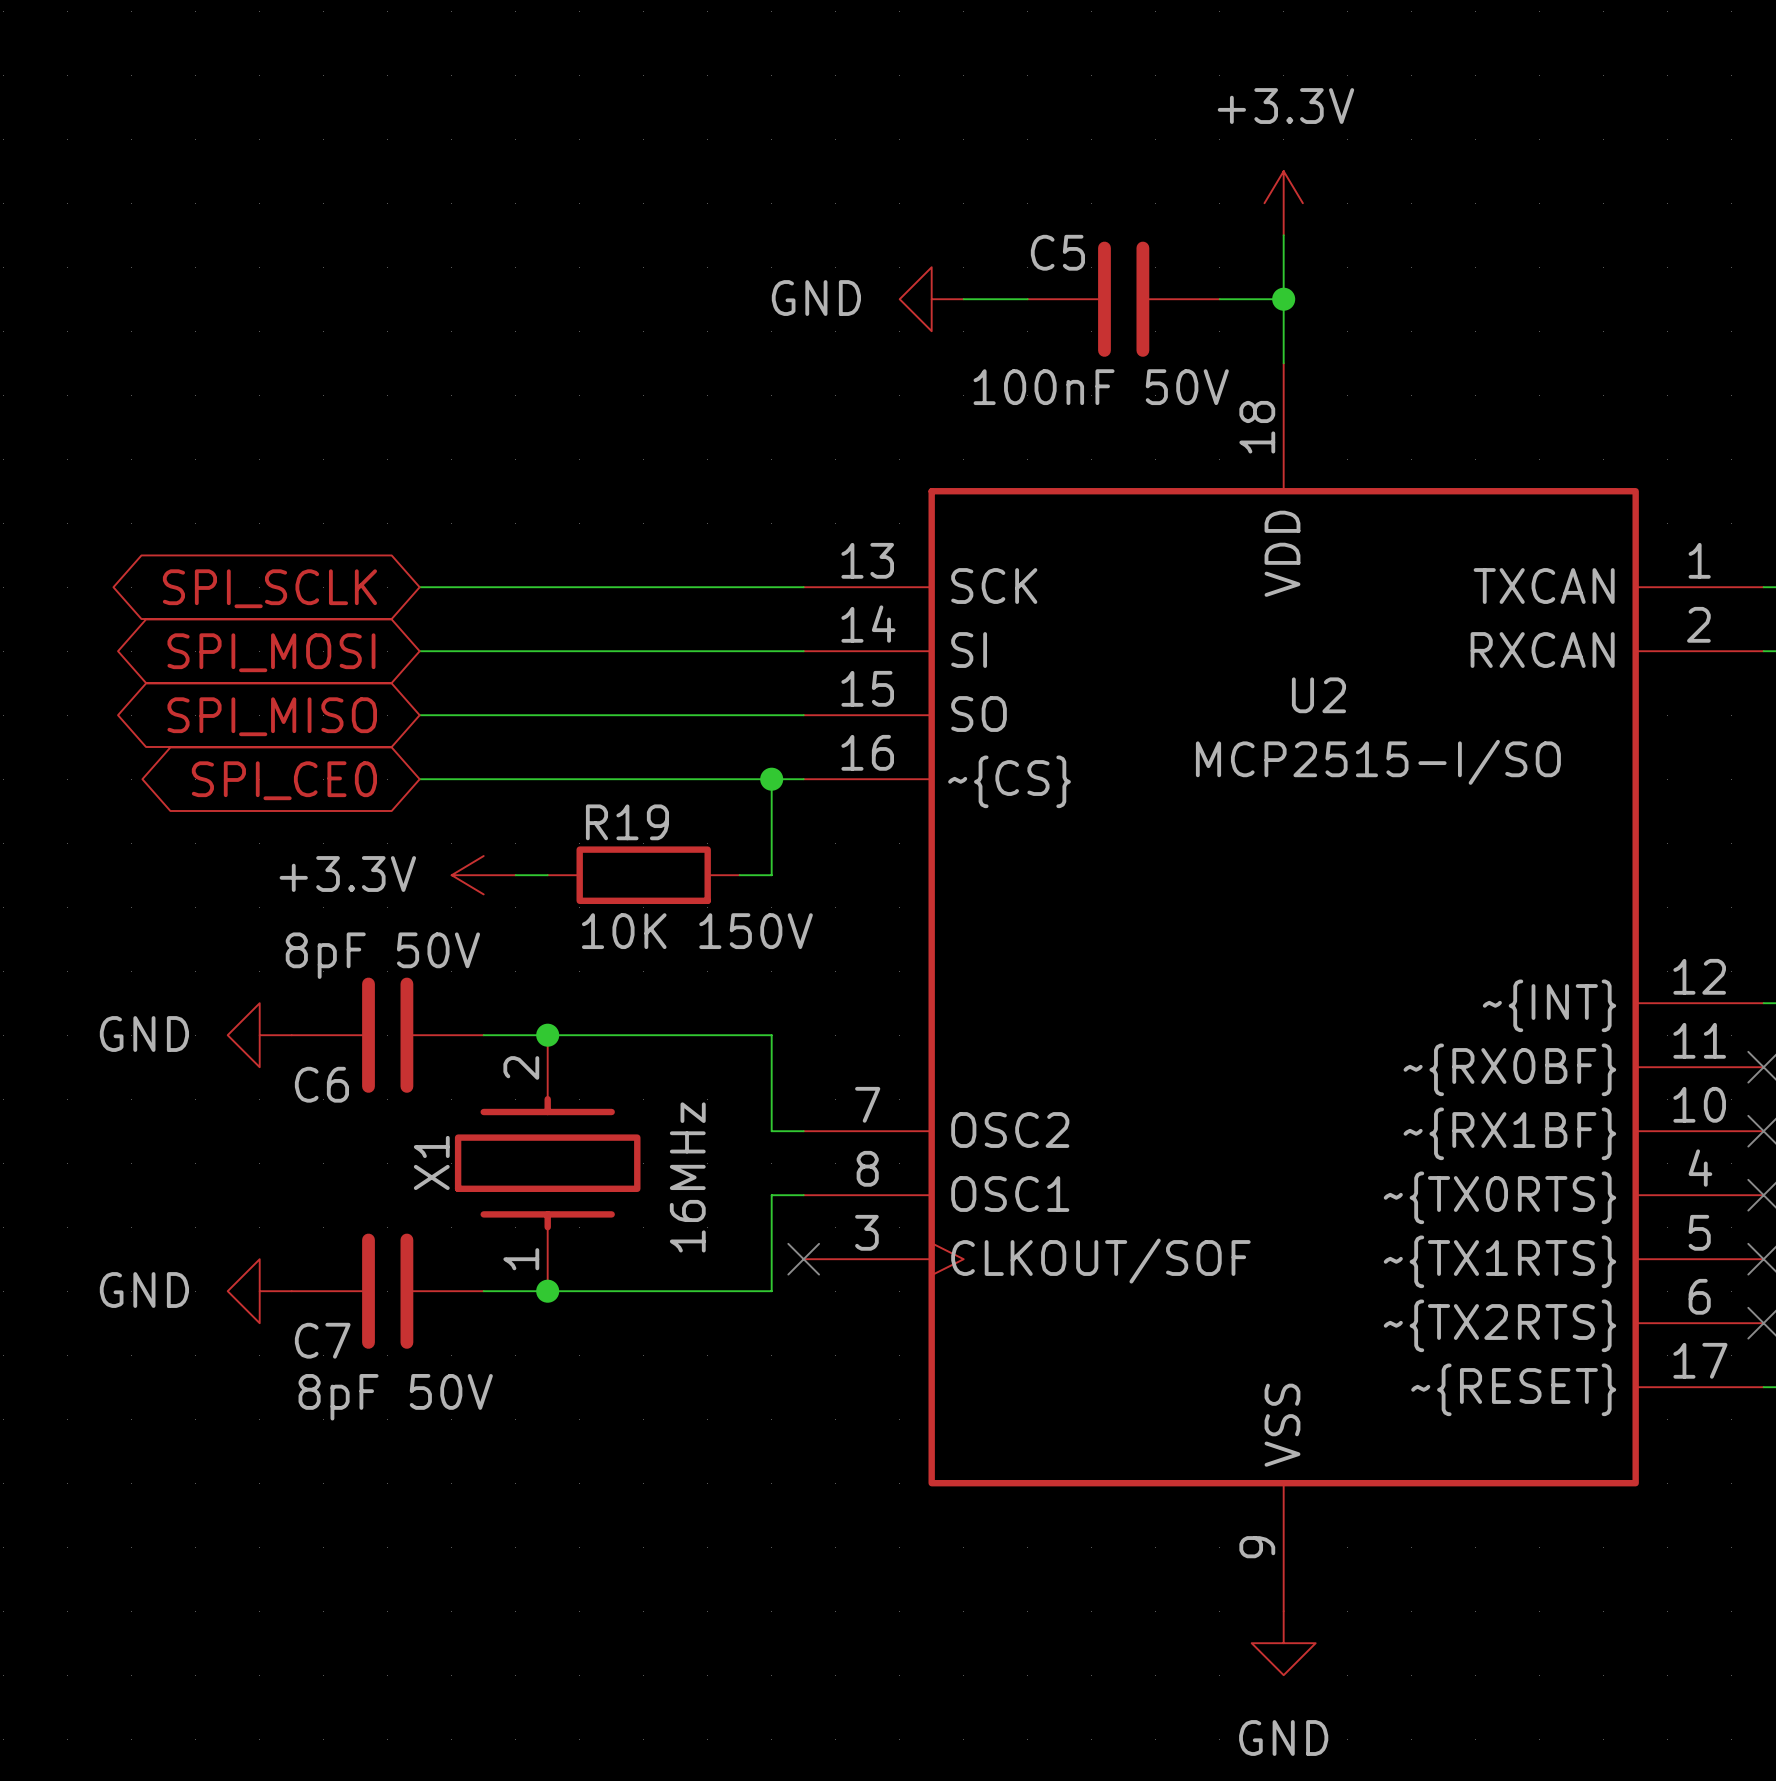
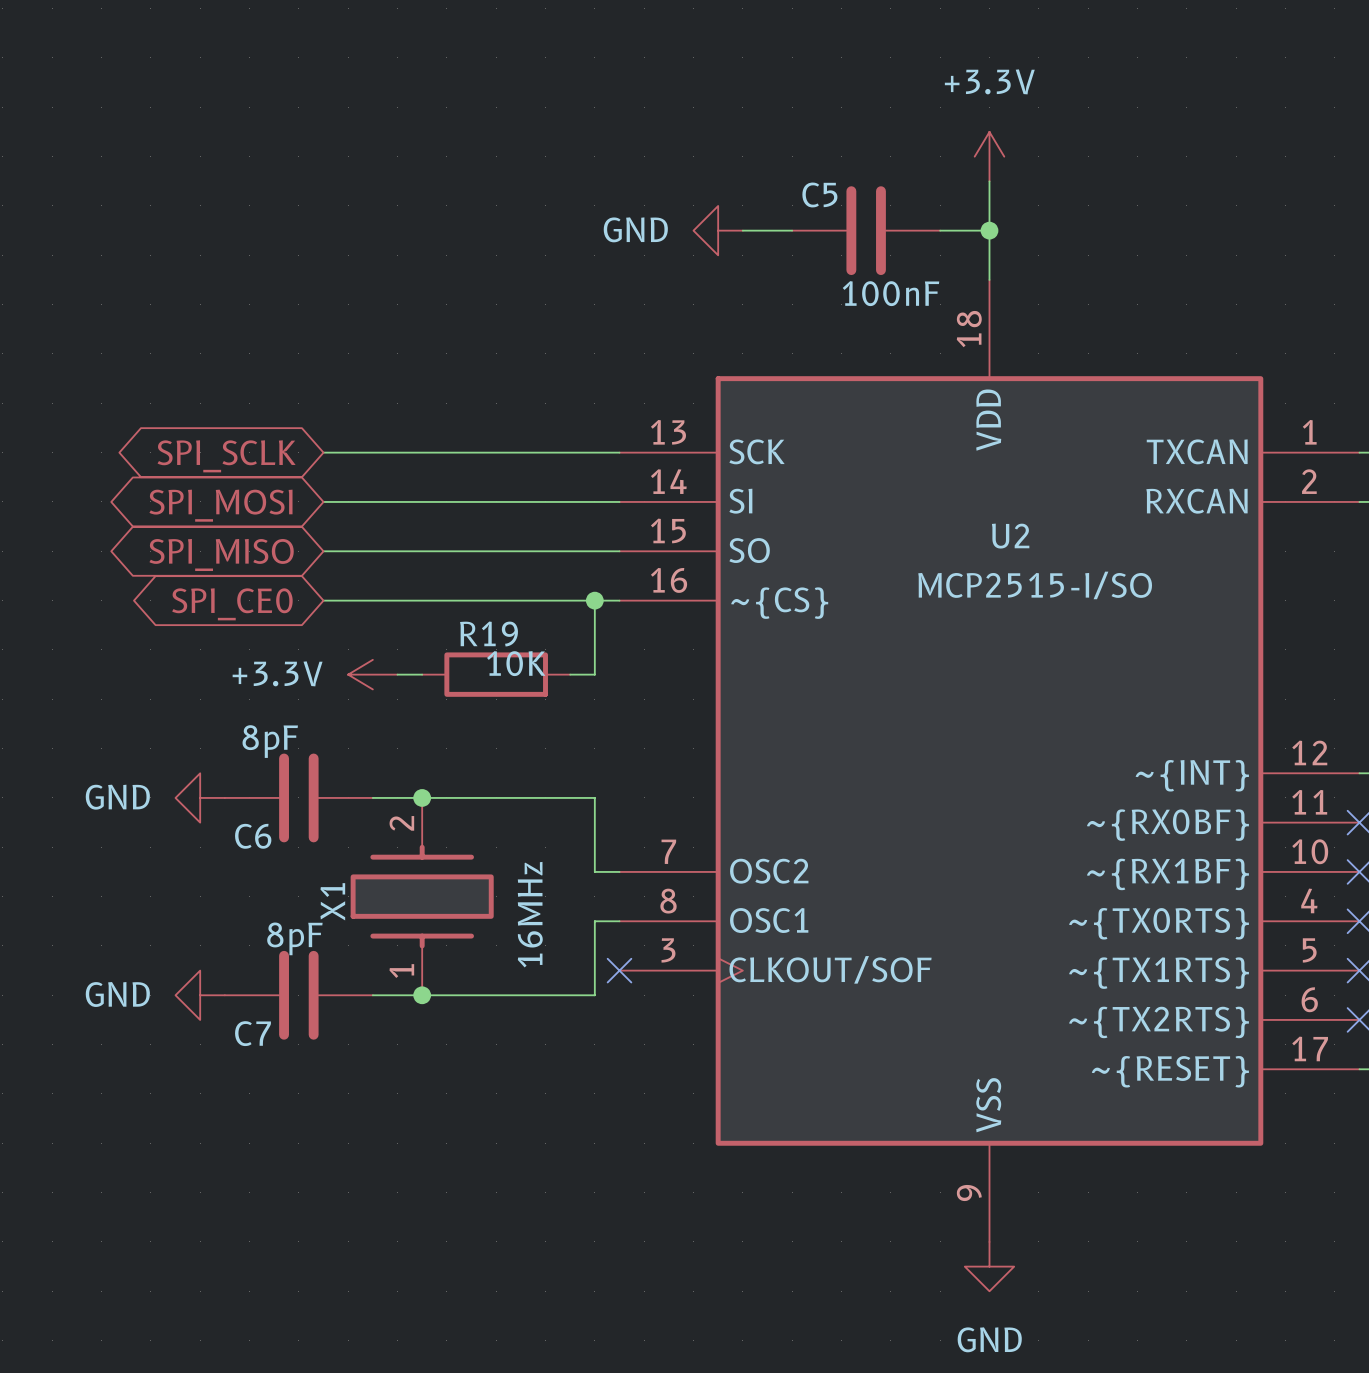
C5 value: 100nF 50V (1101, 387) -> 100nF (891, 293)
R19 value: 10K 150V (697, 931) -> 10K (516, 663)
C6 value: 8pF 50V (382, 955) -> 8pF (270, 741)
C7 value: 8pF 50V (395, 1397) -> 8pF (294, 938)

